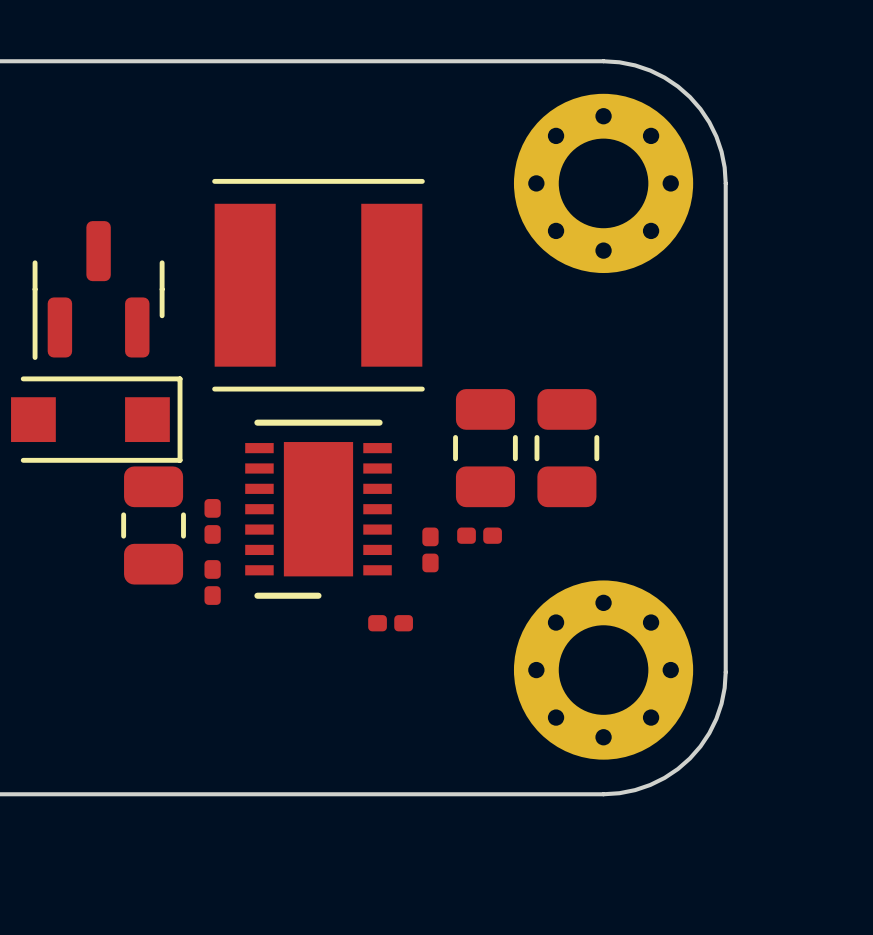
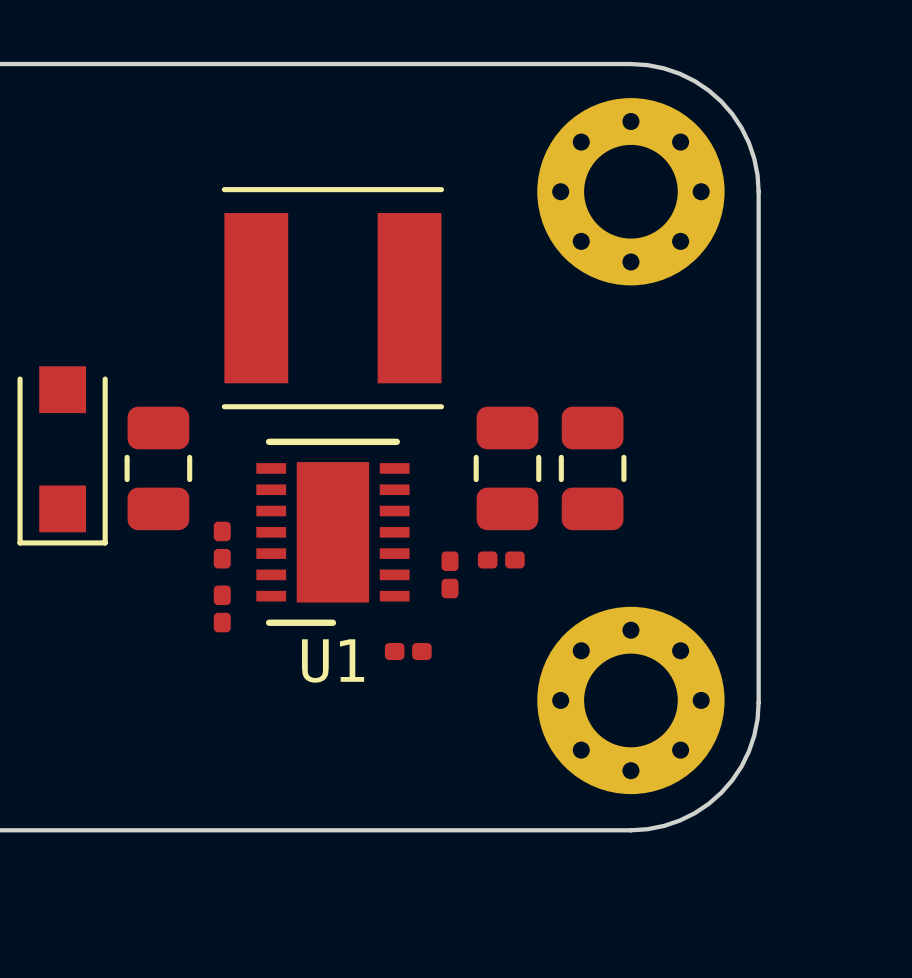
part: (98, 290) -> none
part rotation: 0° (96, 419) -> 90° clockwise (62, 455)
part position: (153, 525) -> (158, 468)
U1 name: none -> U1 (333, 660)

